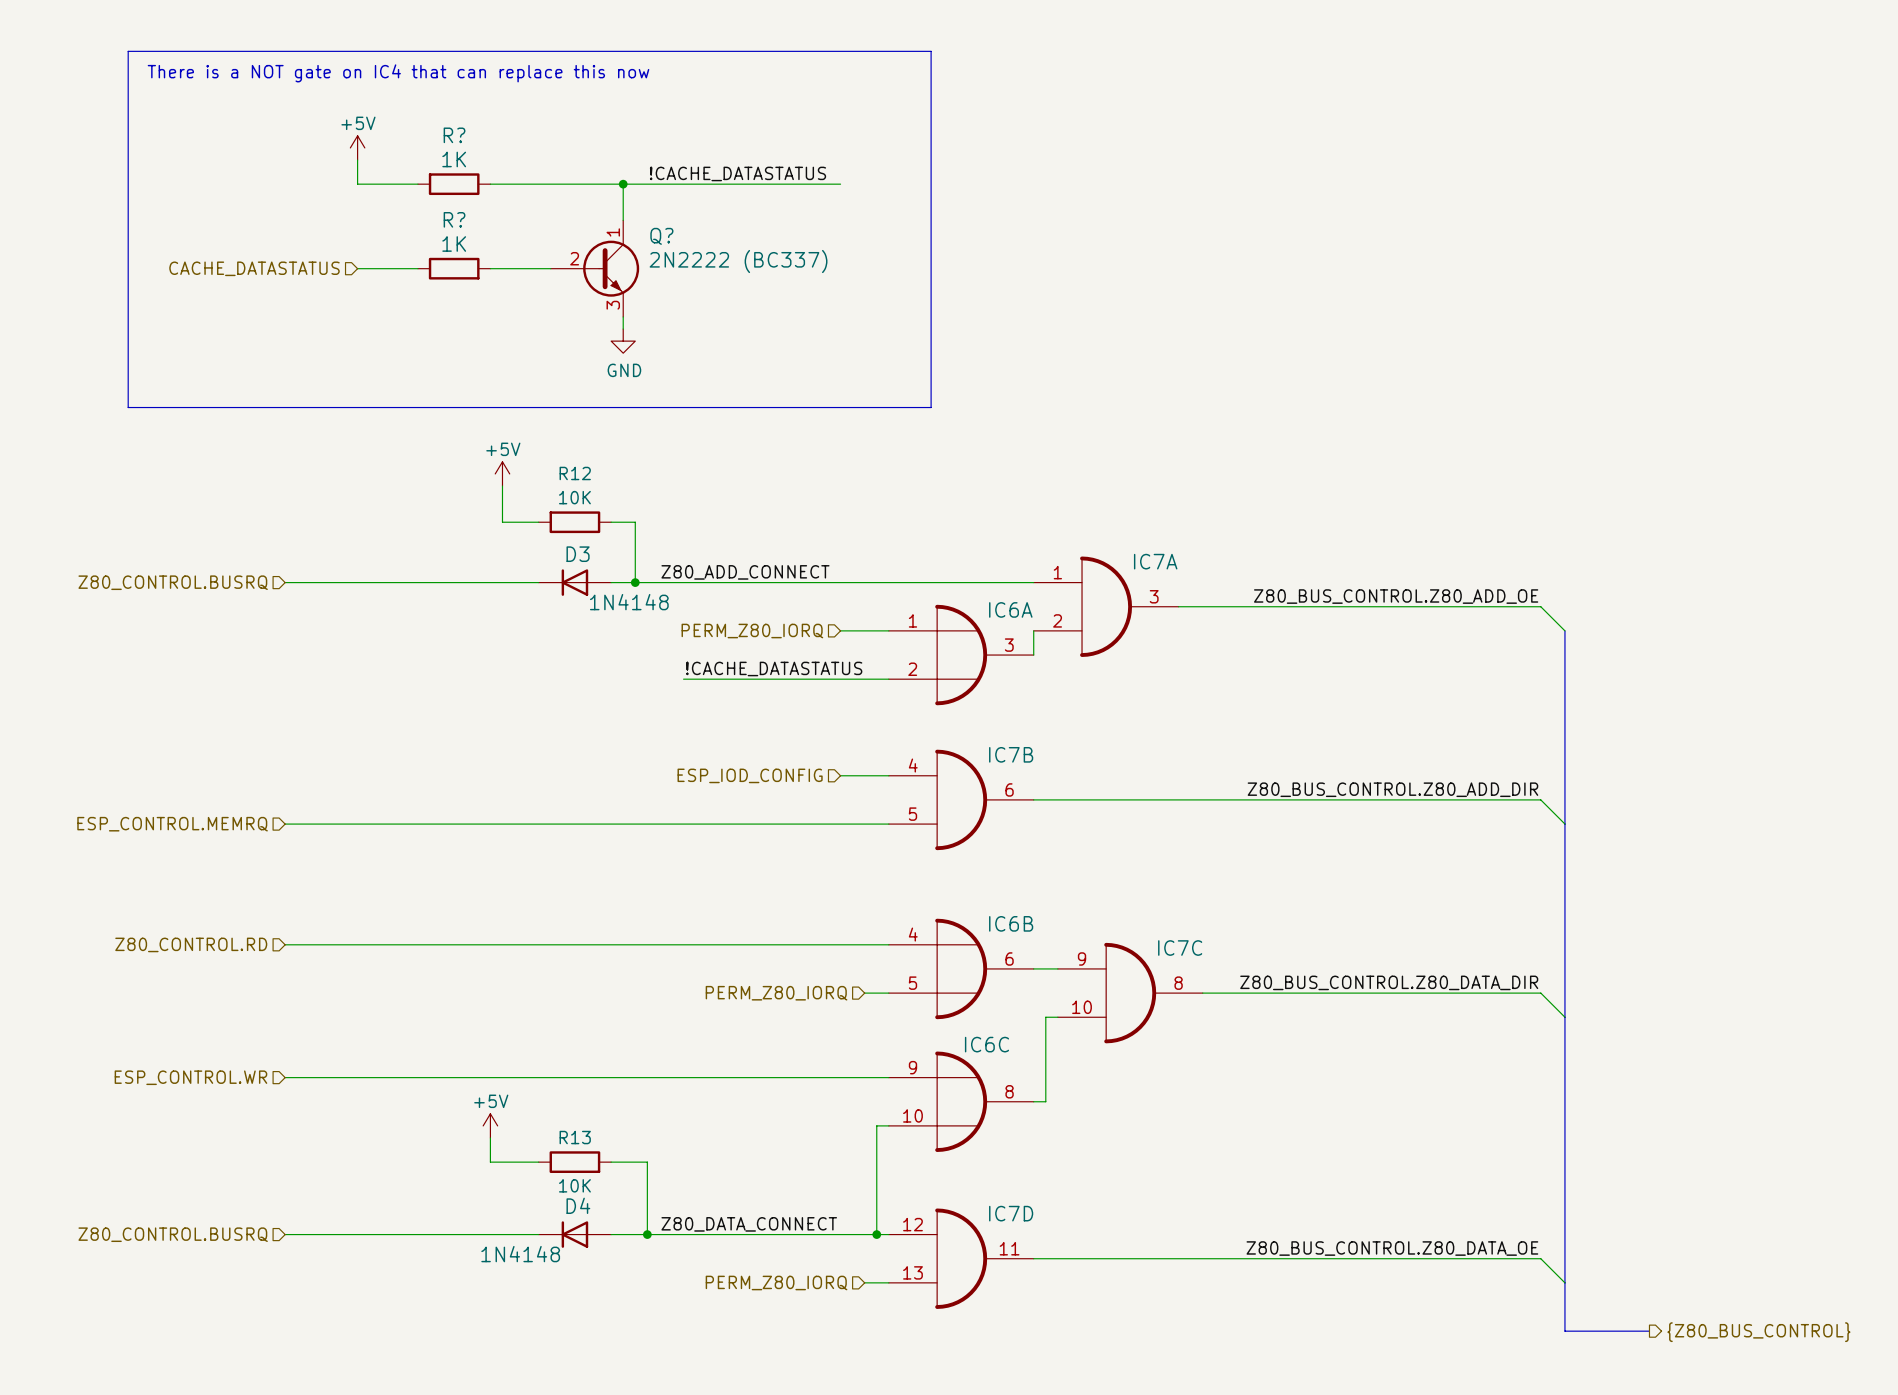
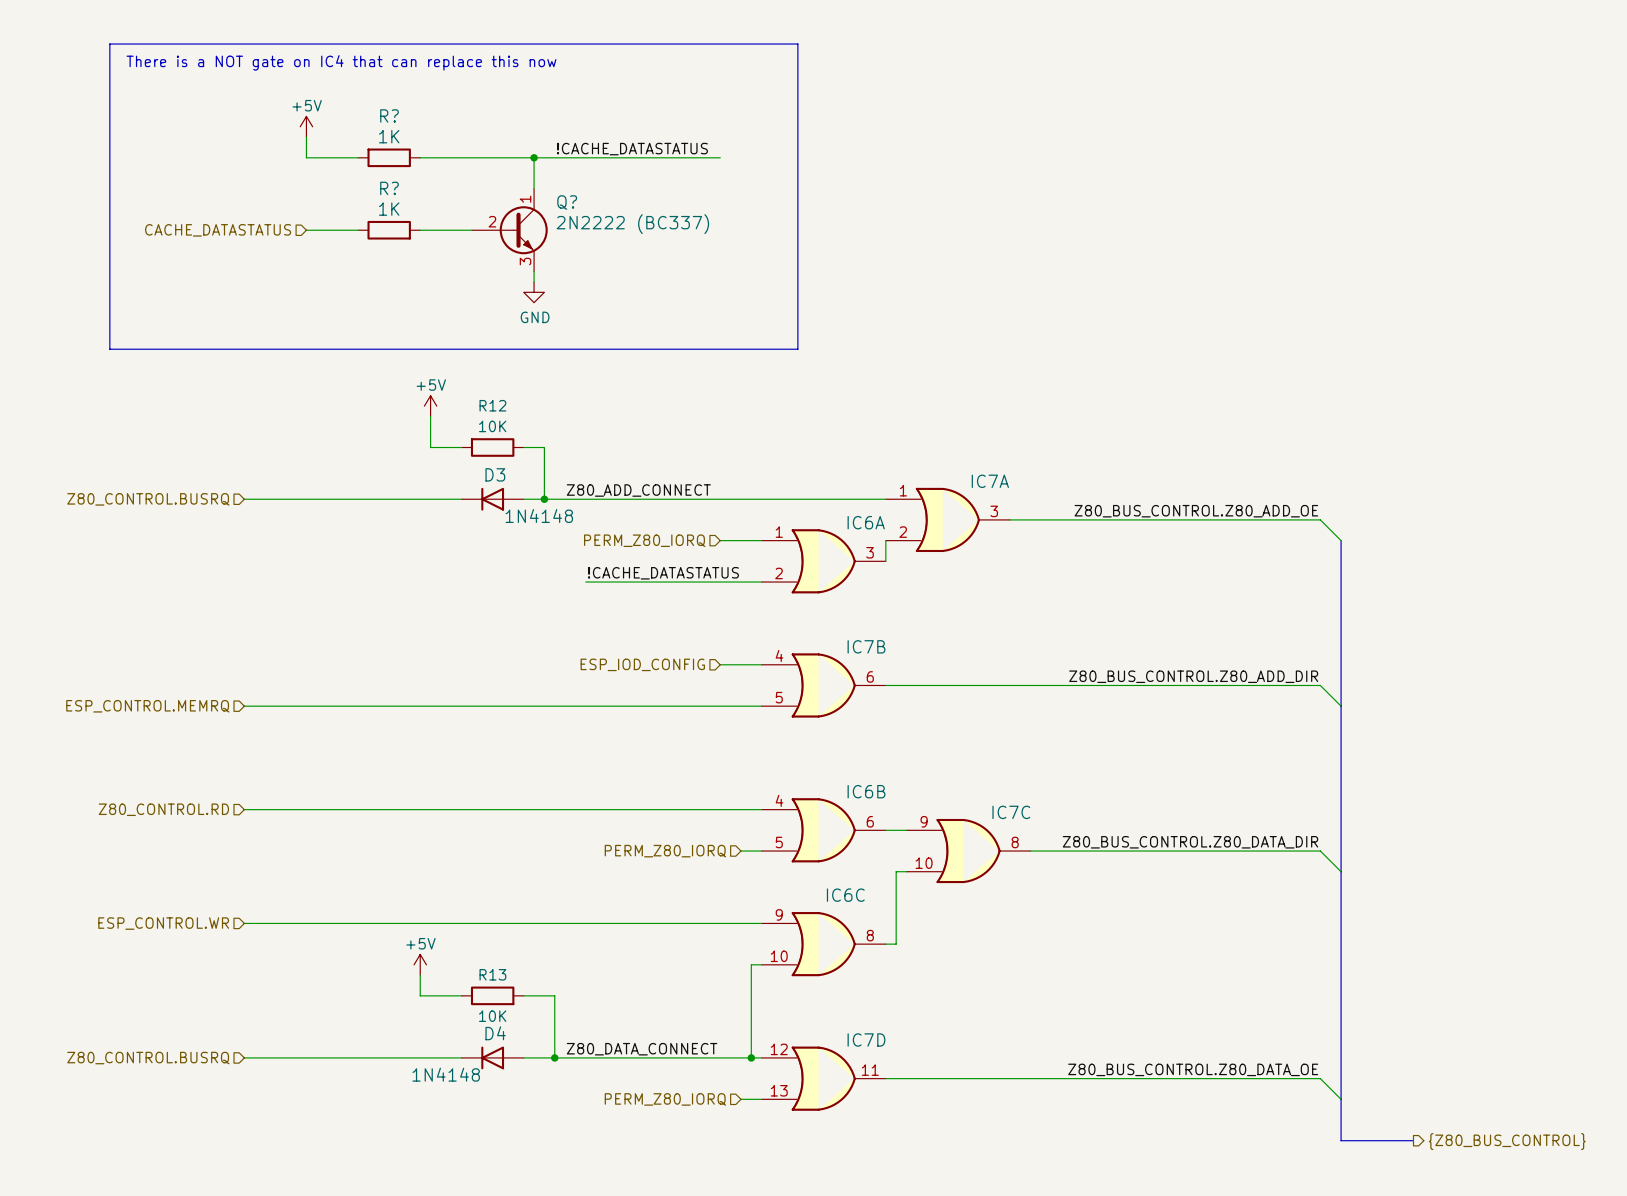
IC7A symbol: [1033, 556, 1179, 657] -> [885, 487, 1010, 553]
IC6A symbol: [888, 604, 1034, 706] -> [761, 529, 886, 594]
IC7B symbol: [888, 749, 1034, 851] -> [761, 653, 886, 718]
IC6B symbol: [888, 918, 1034, 1020] -> [761, 798, 886, 863]
IC7C symbol: [1057, 942, 1203, 1044] -> [906, 818, 1031, 884]
IC6C symbol: [888, 1051, 1034, 1152] -> [761, 912, 886, 977]
IC7D symbol: [888, 1208, 1034, 1309] -> [761, 1046, 886, 1111]

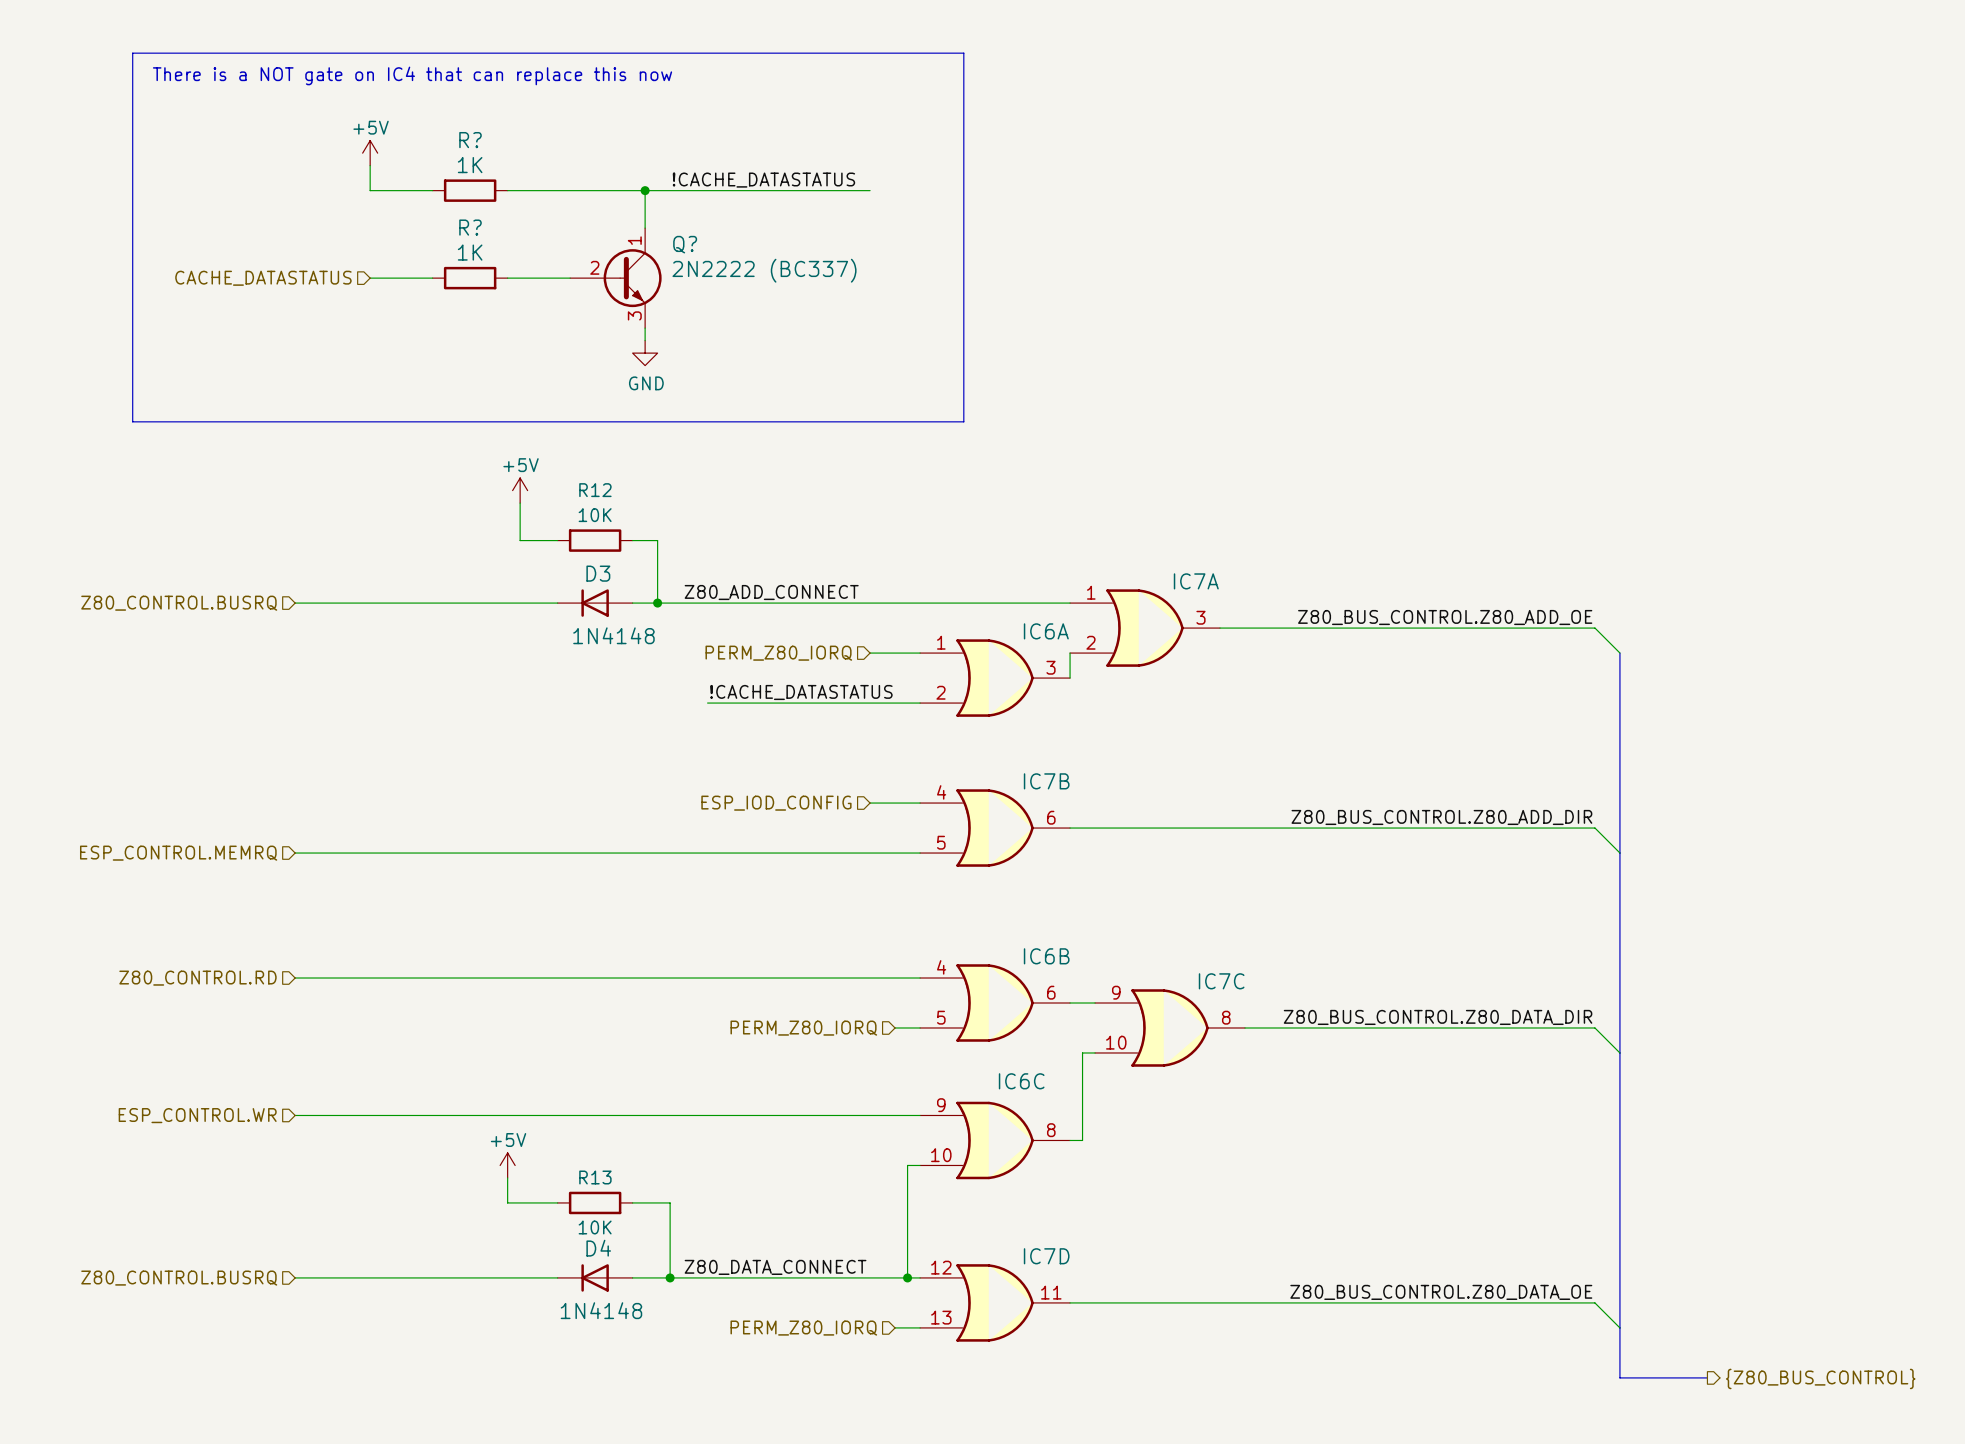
D3 value position: 1N4148 (539, 515) -> 1N4148 (613, 635)
D4 value position: 1N4148 (446, 1074) -> 1N4148 (601, 1310)

